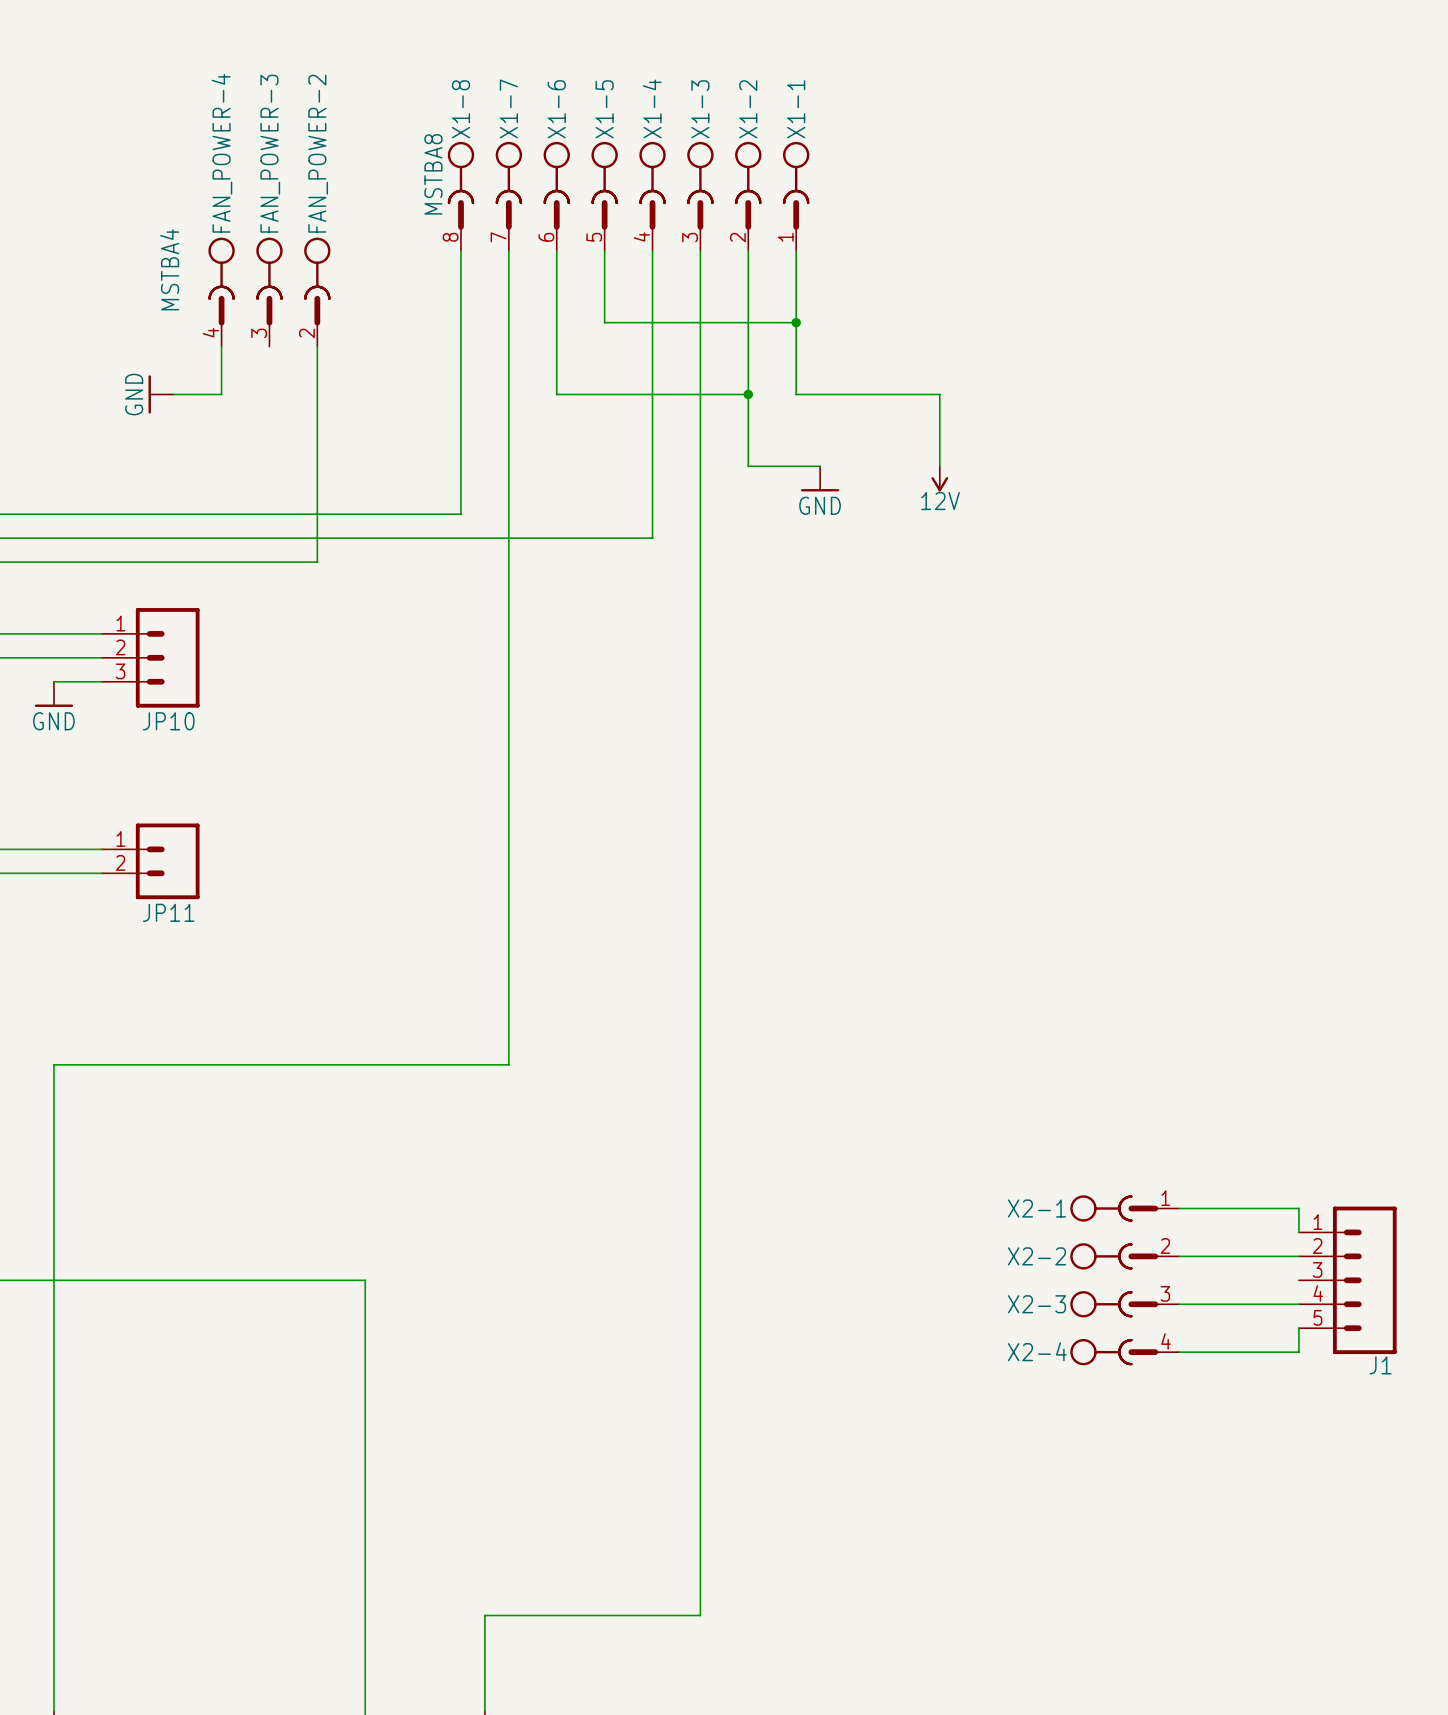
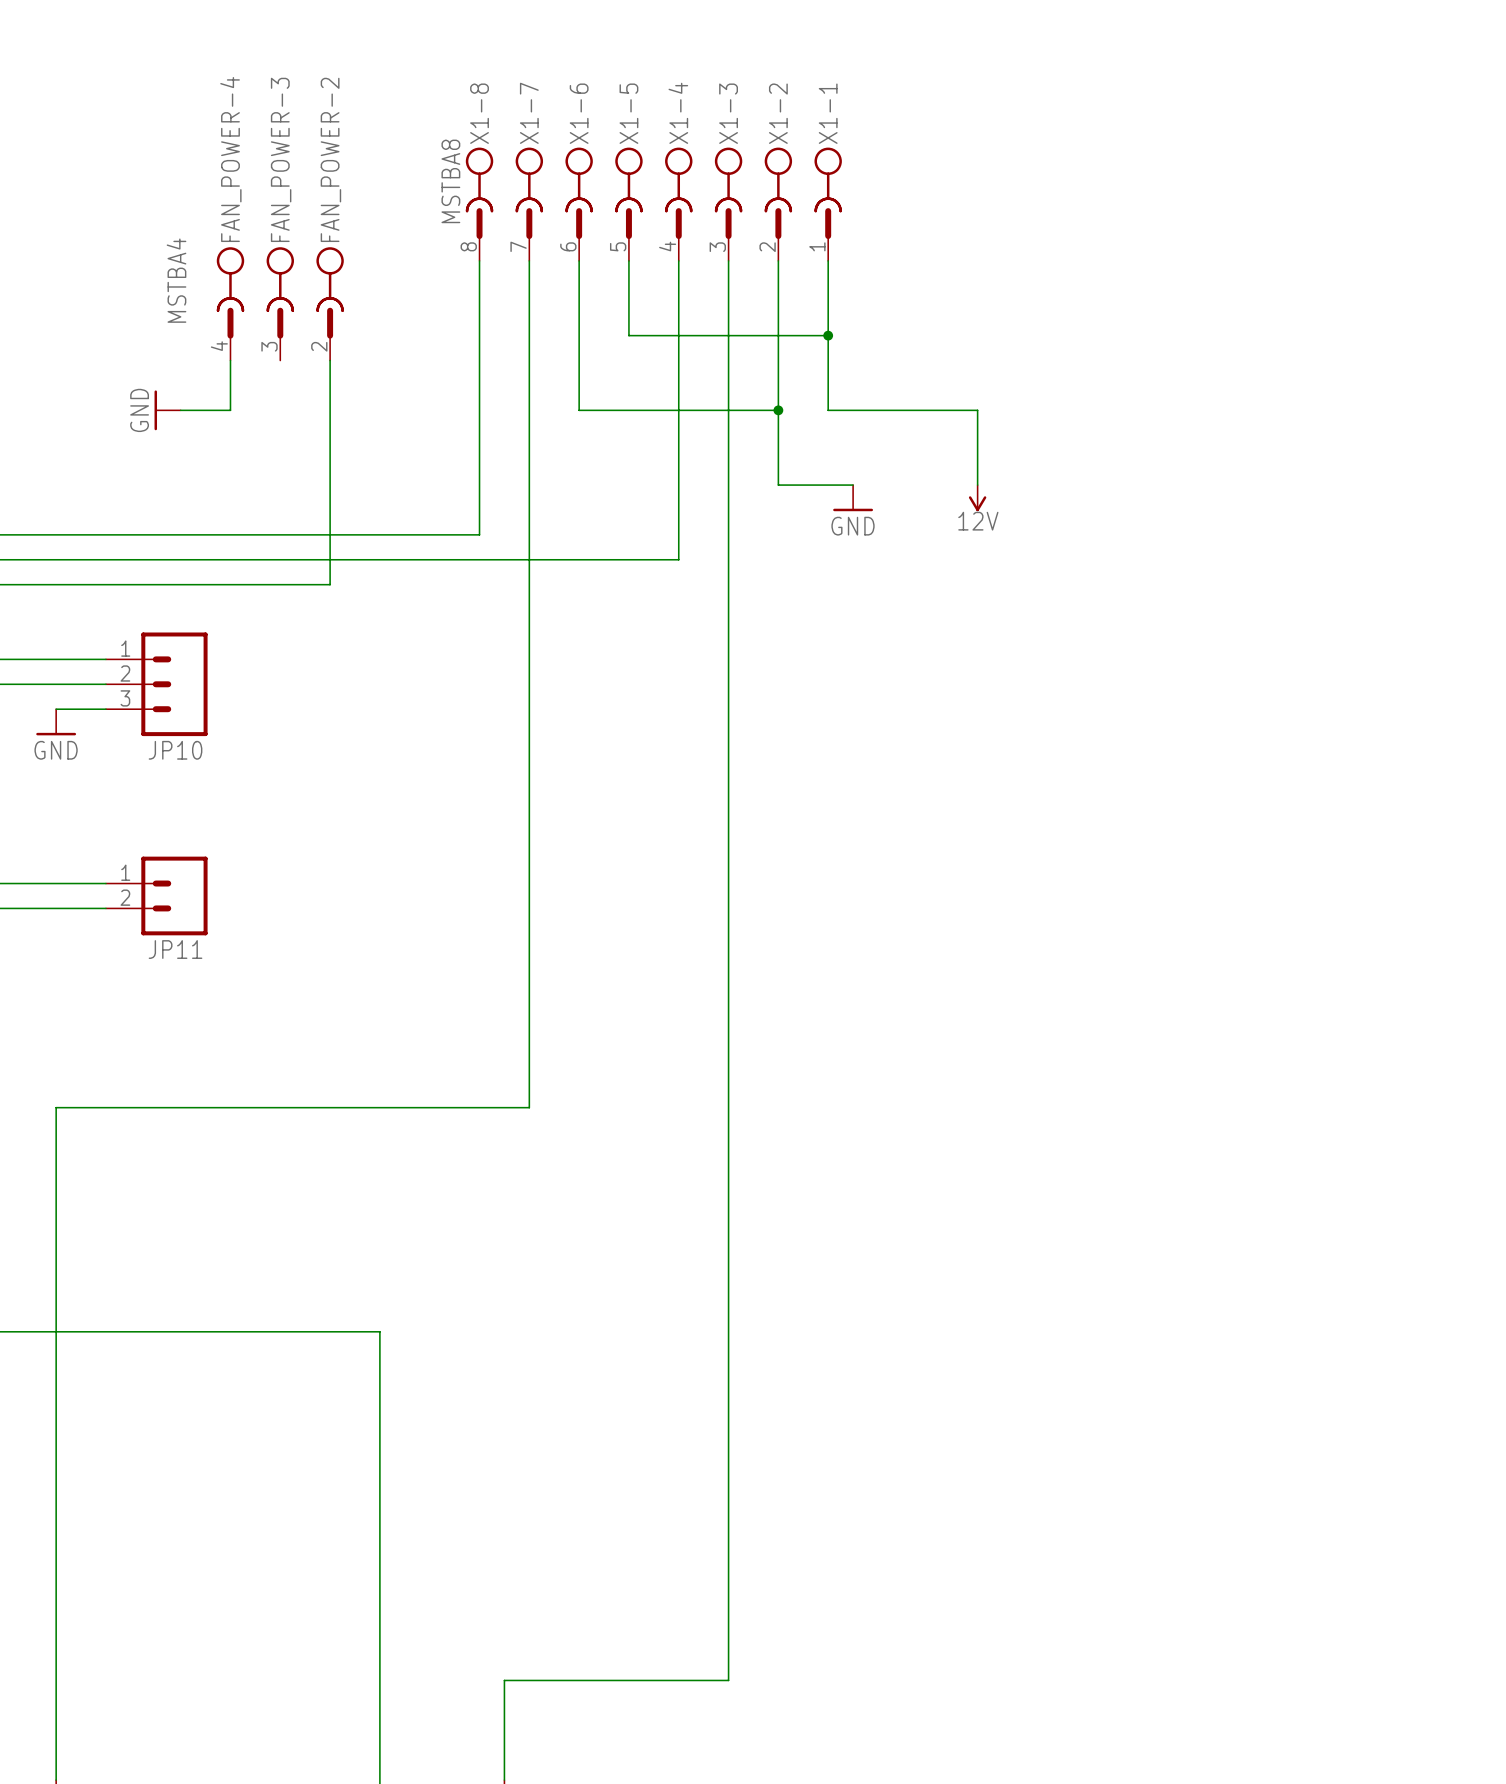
X2-1: (1124, 1208) -> none
wire: (1179, 1208) (1298, 1208) (1298, 1232) -> none
X2-2: (1124, 1256) -> none
wire: (1179, 1256) (1298, 1256) -> none
J1: (1347, 1280) -> none
X2-3: (1124, 1304) -> none
wire: (1179, 1304) (1298, 1304) -> none
wire: (1298, 1328) (1298, 1352) (1179, 1352) -> none
X2-4: (1124, 1352) -> none

